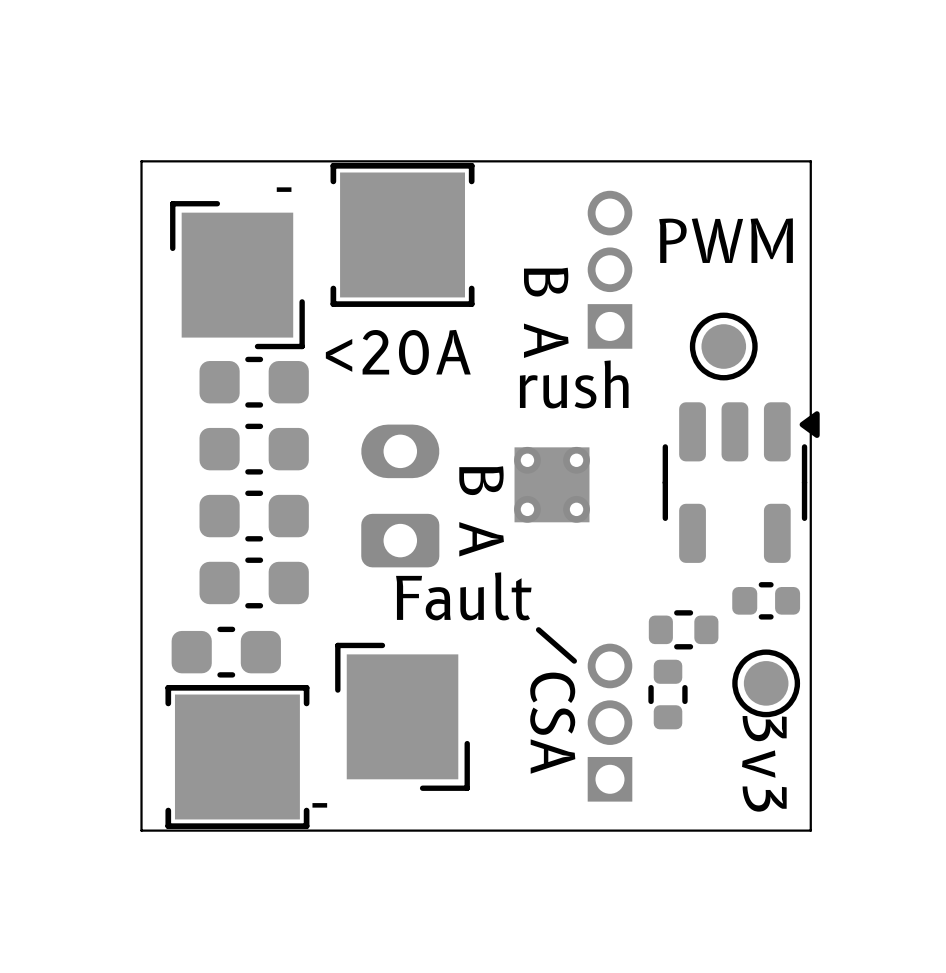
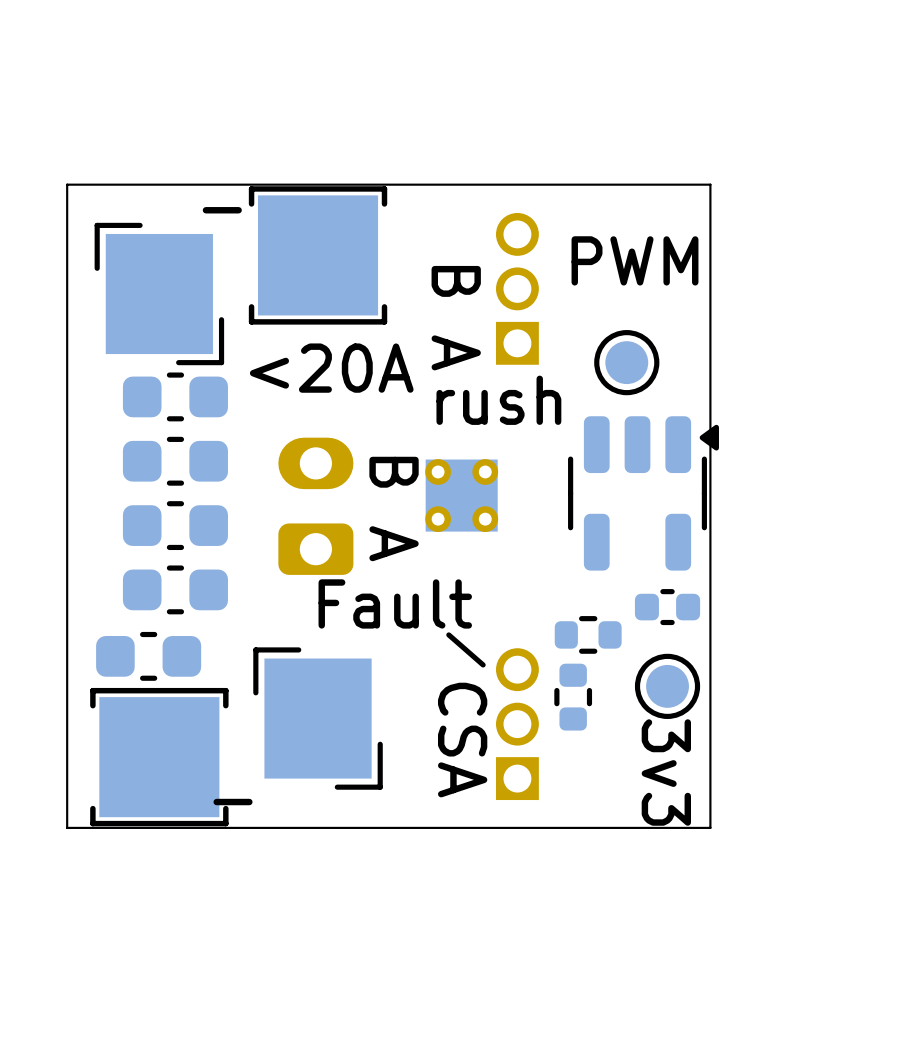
text position: - (319, 805) -> - (233, 802)

